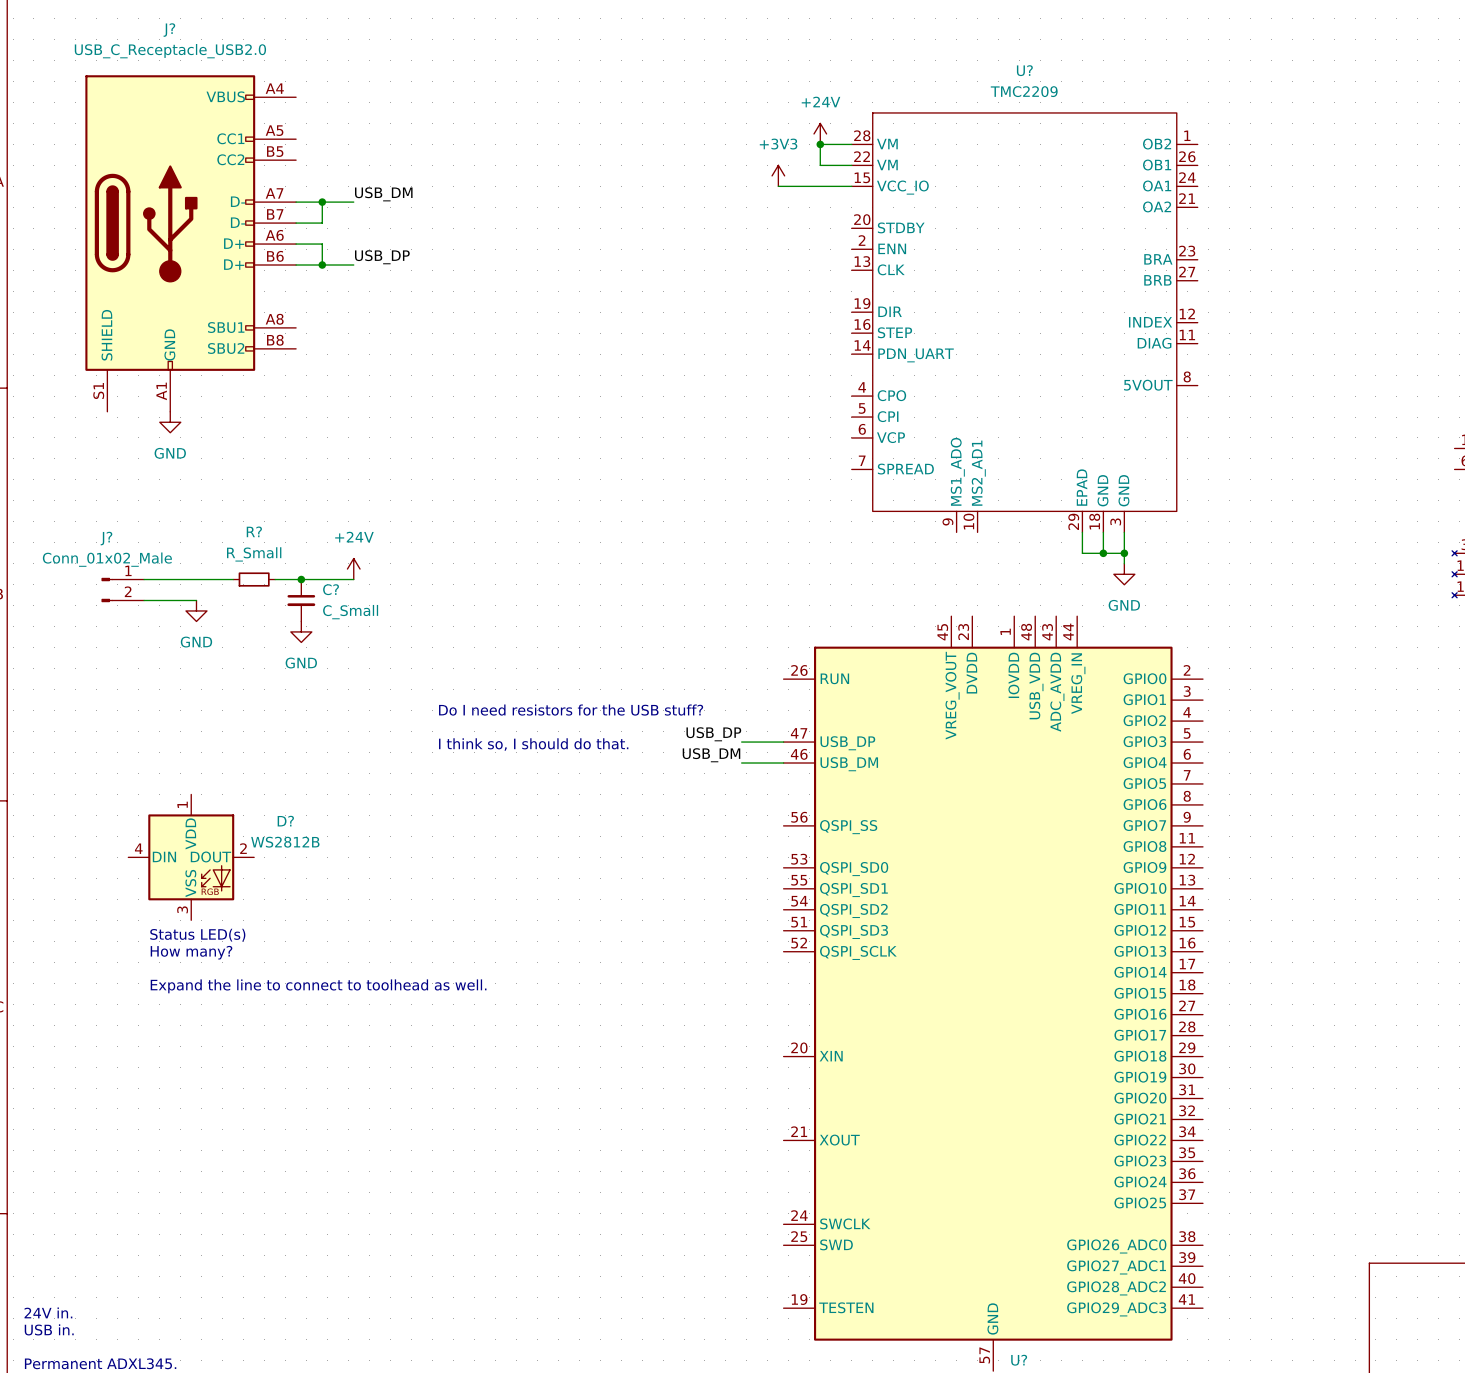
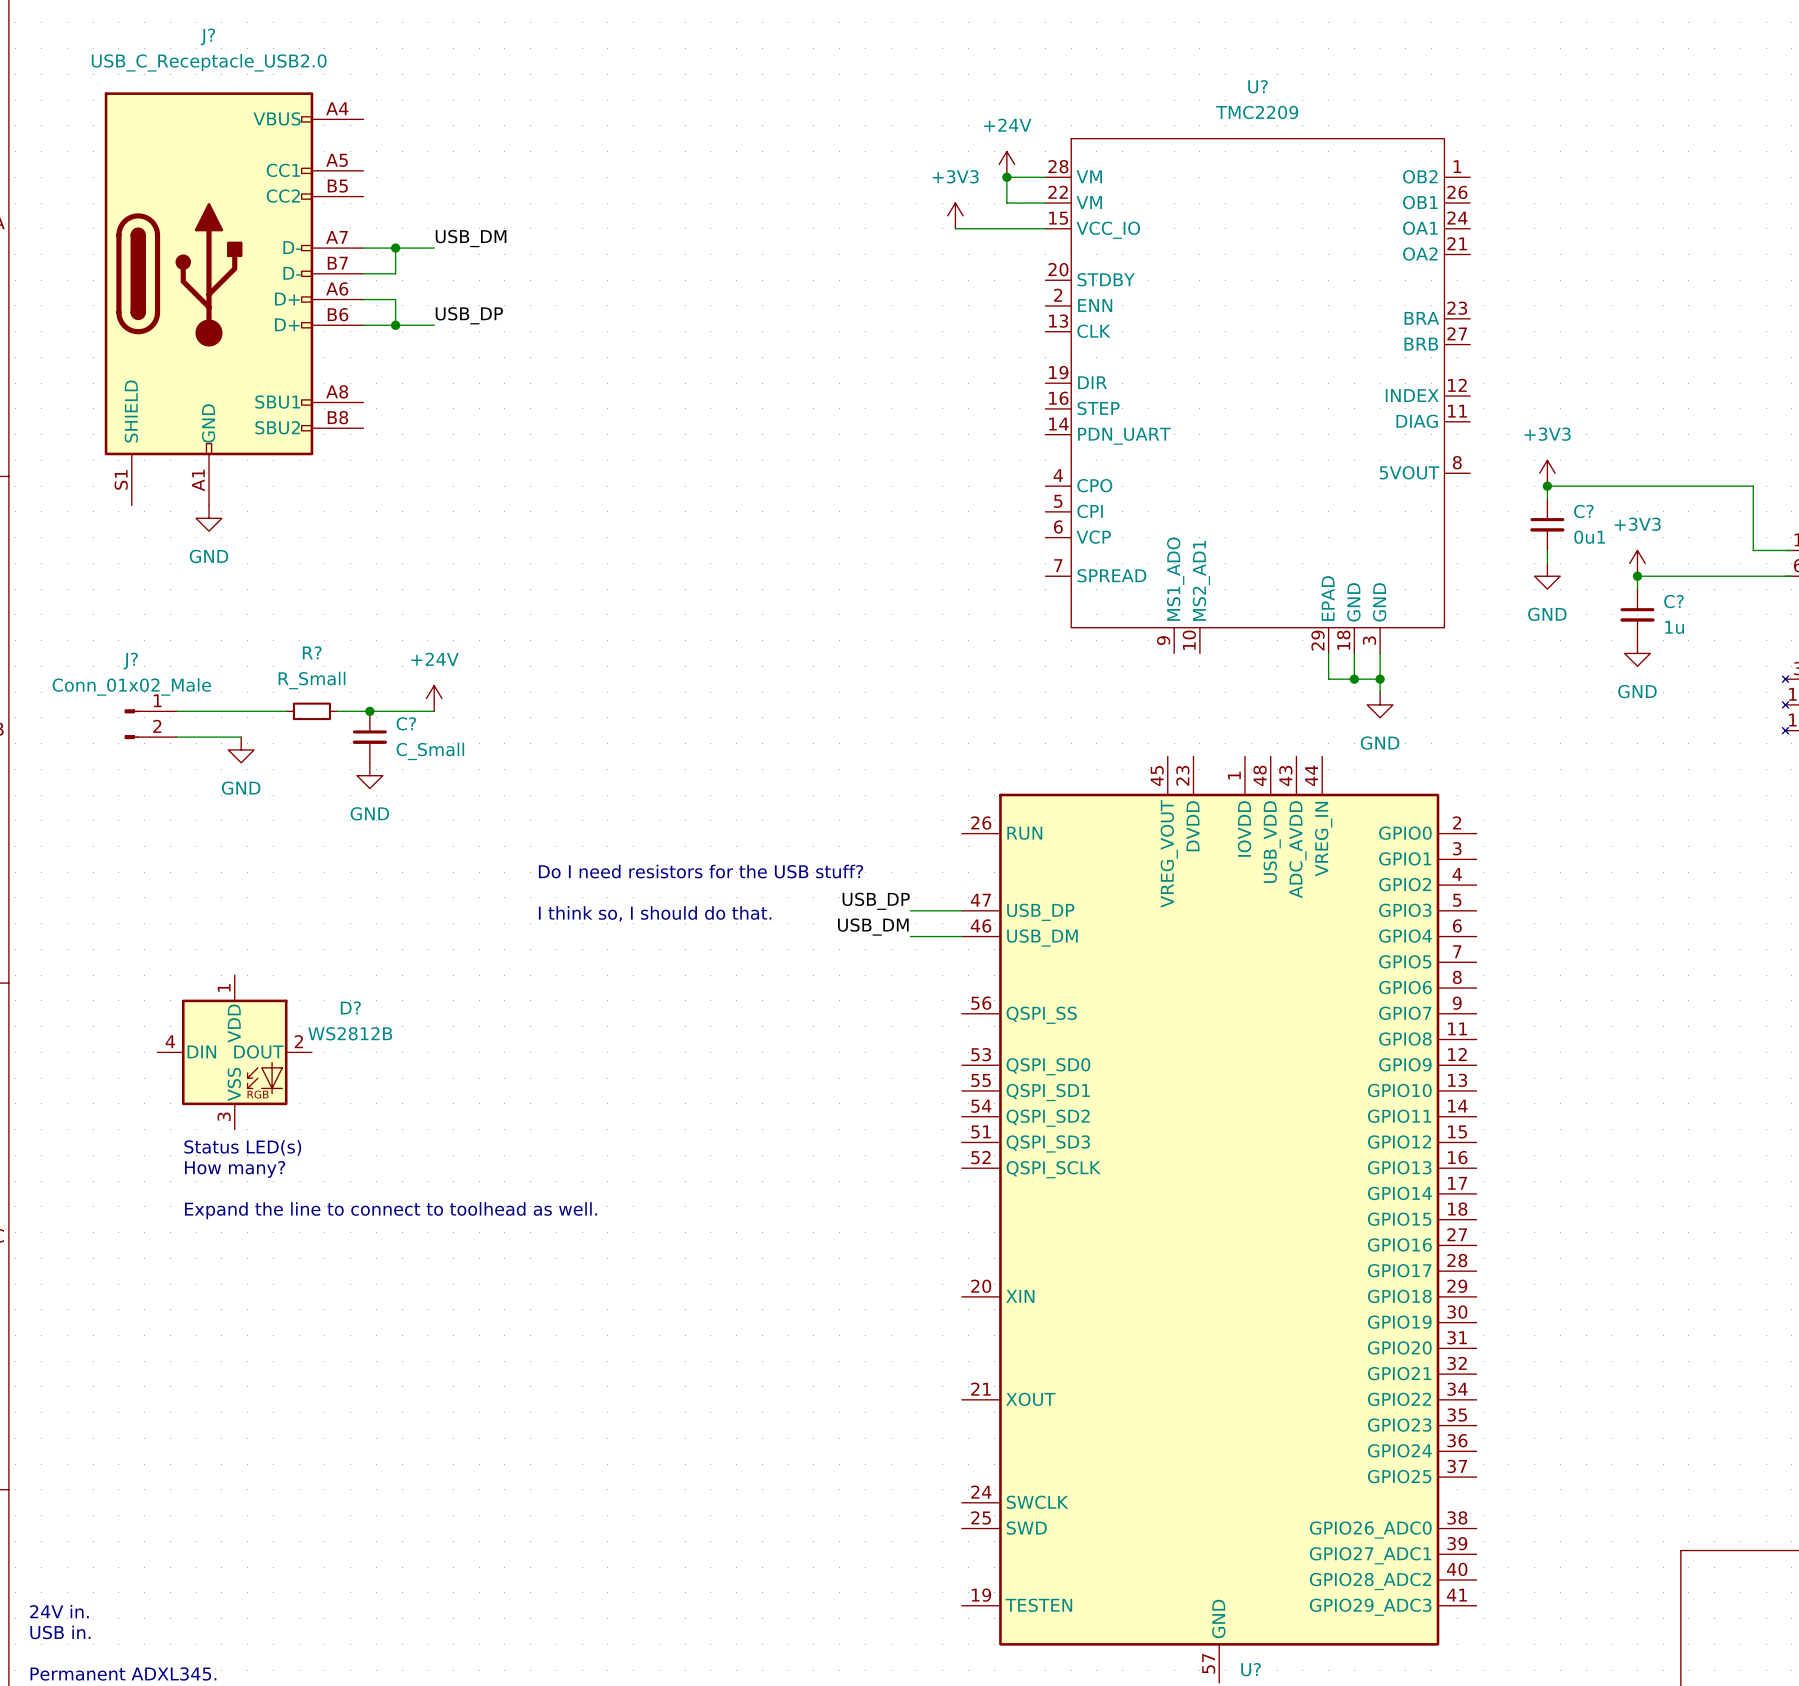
power symbol: none -> +3V3 (1547, 473)
junction: none -> (1547, 486)
wire: none -> (1547, 499) (1547, 486) (1753, 486) (1753, 550) (1791, 550)
C?: none -> 0u1 (1547, 524)
wire: none -> (1547, 550) (1547, 563)
power symbol: none -> +3V3 (1637, 563)
power symbol: none -> GND (1547, 576)
junction: none -> (1637, 576)
wire: none -> (1791, 576) (1637, 576) (1637, 589)
C?: none -> 1u (1637, 614)
power symbol: none -> GND (1637, 653)

